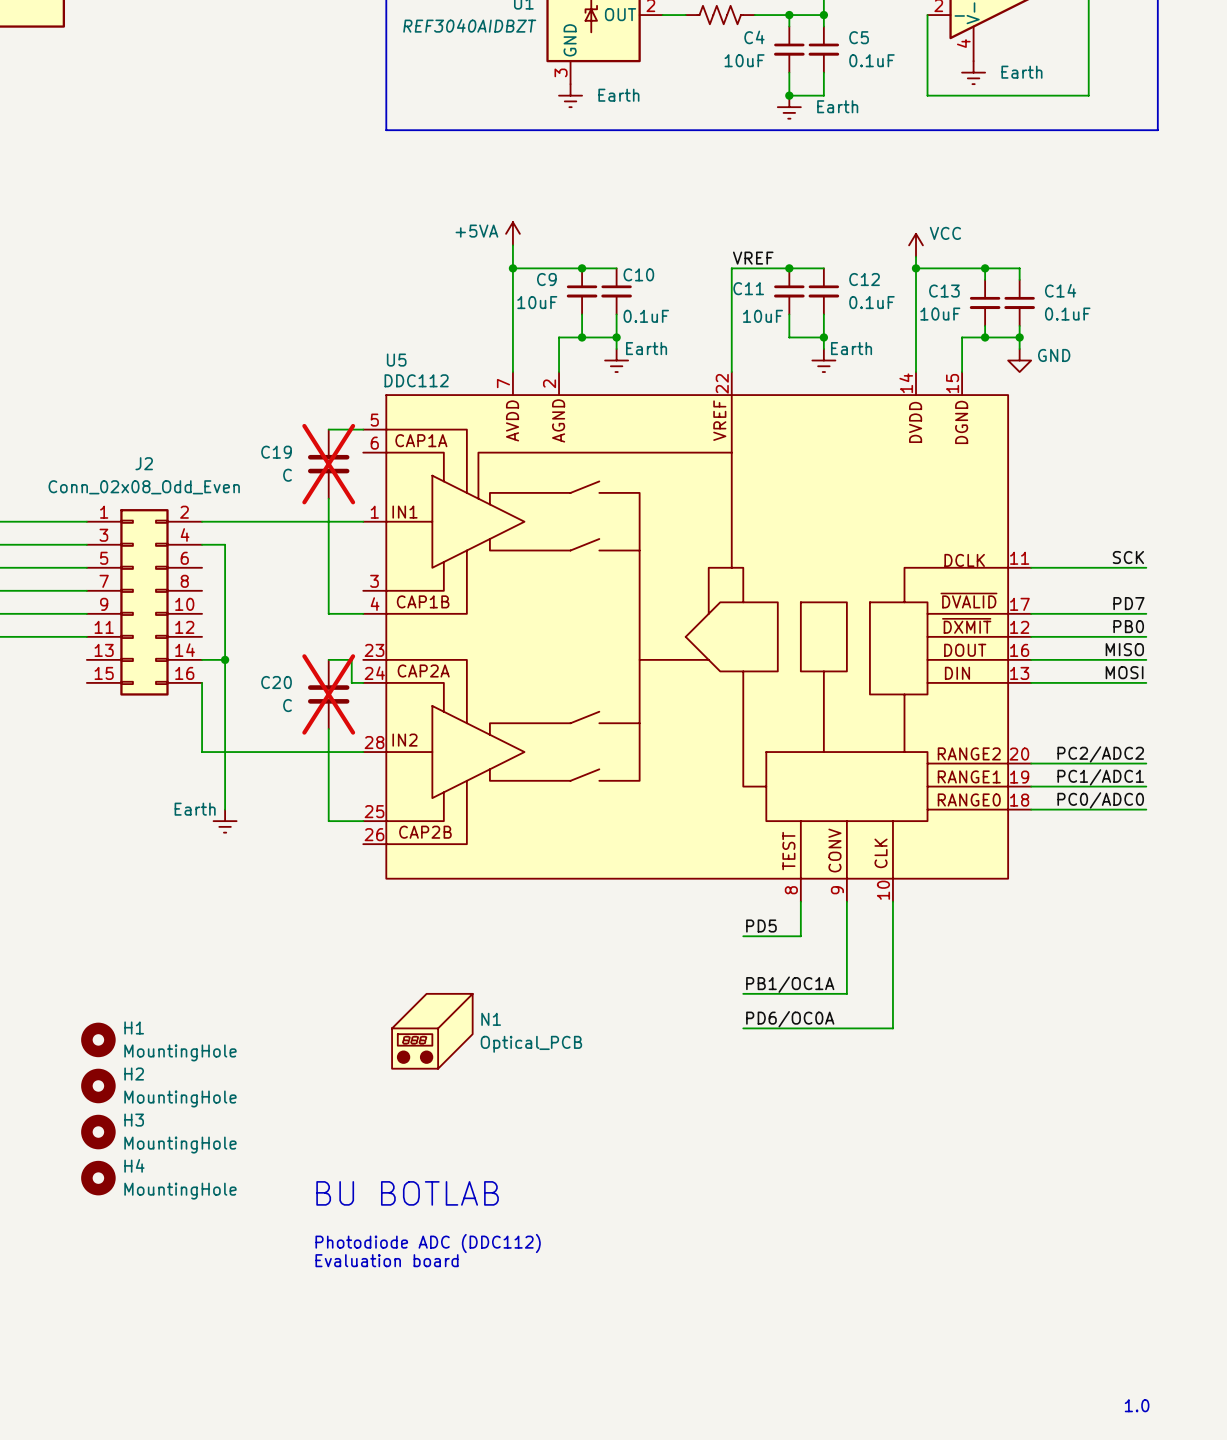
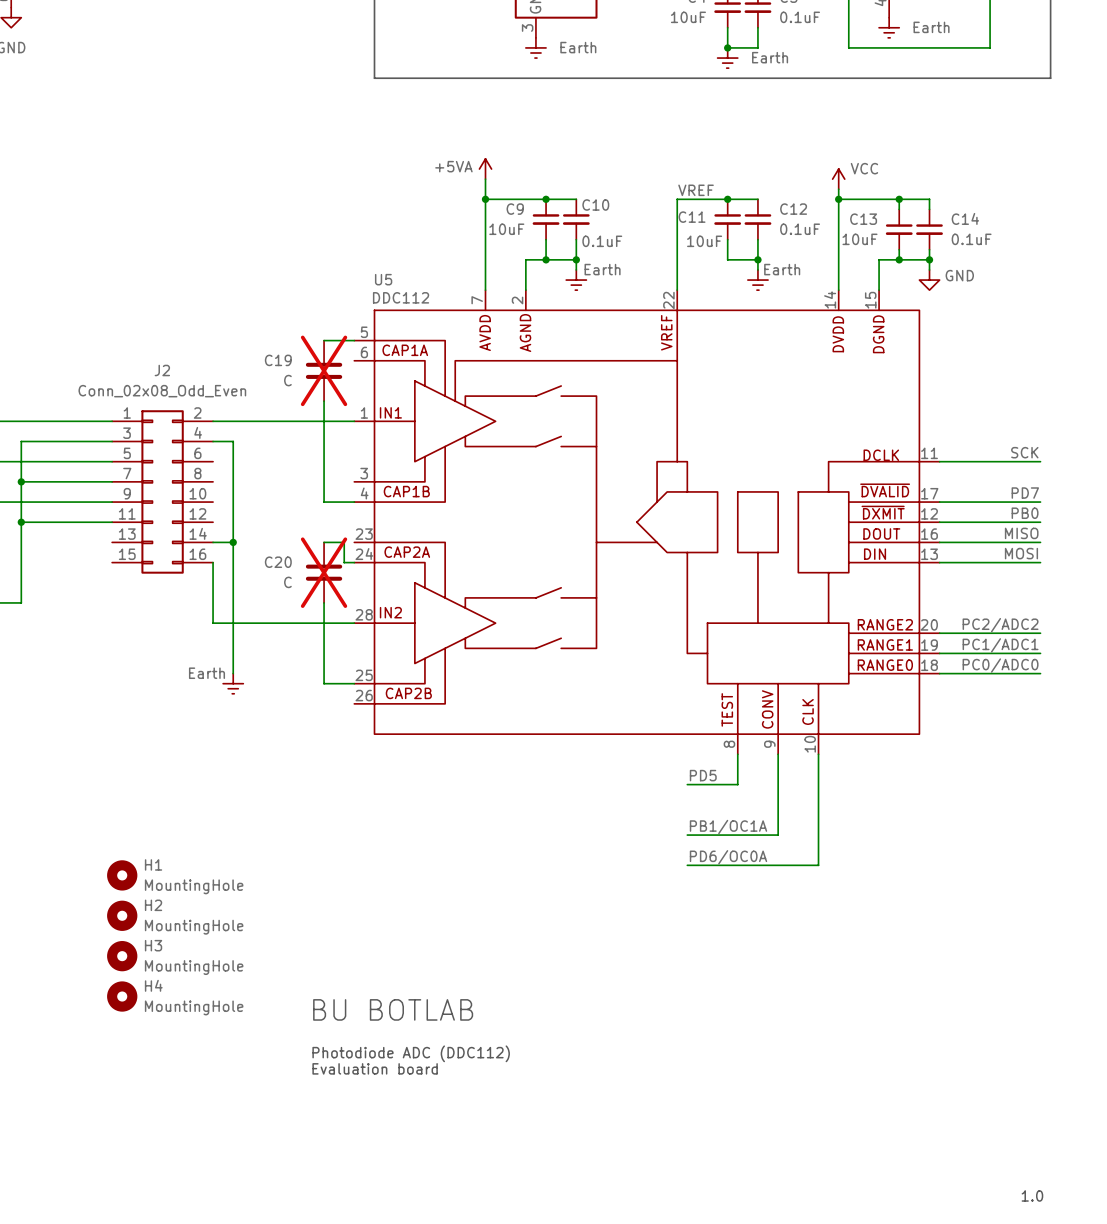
N1: Optical_PCB (432, 1031) -> none

